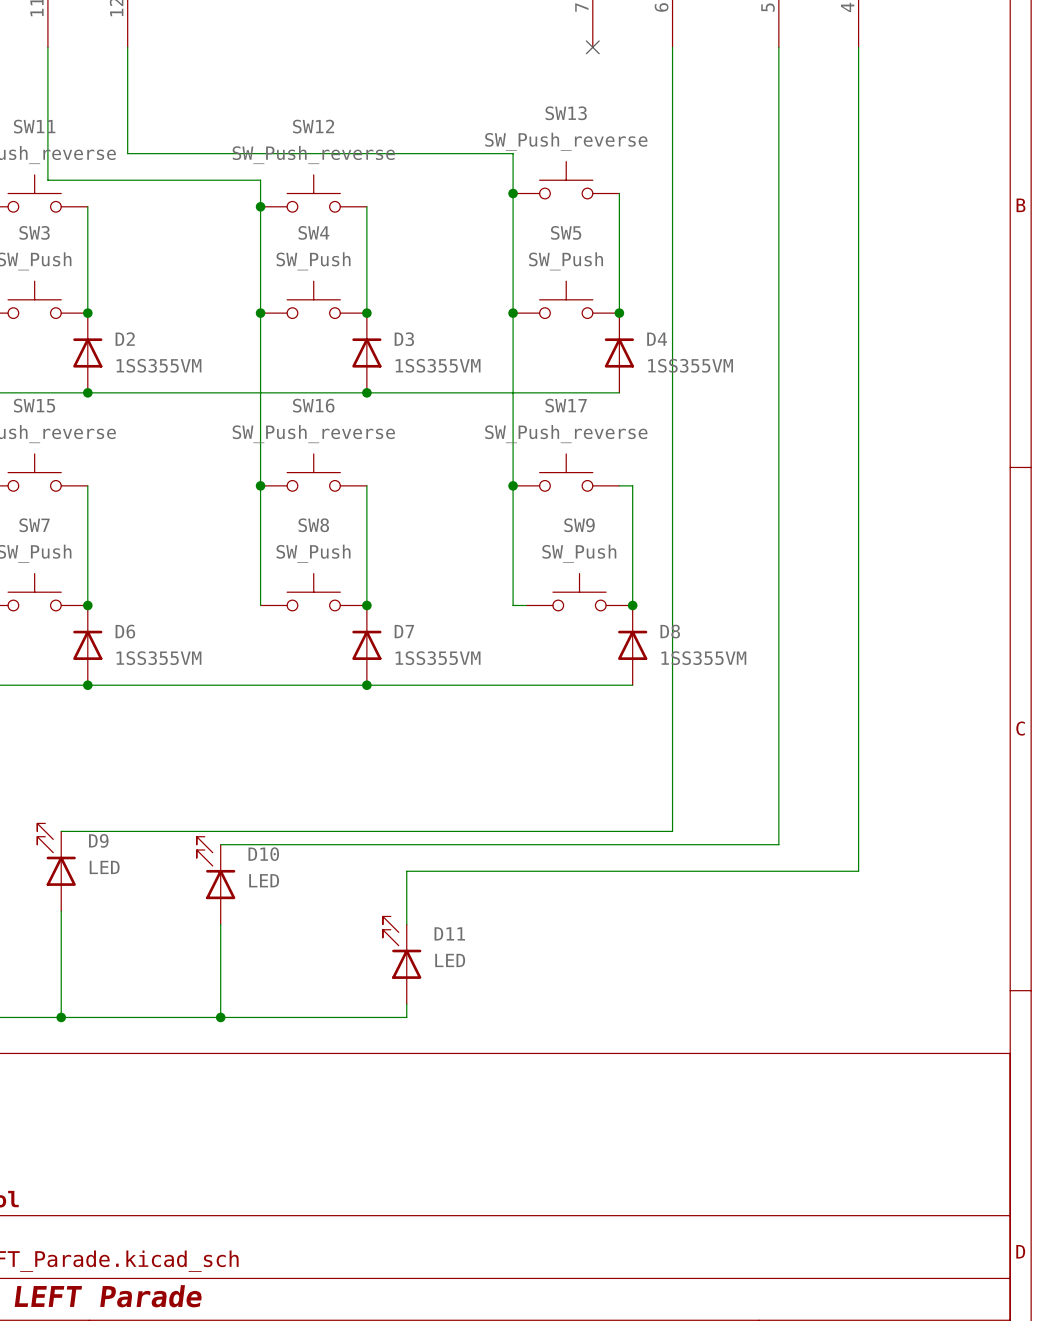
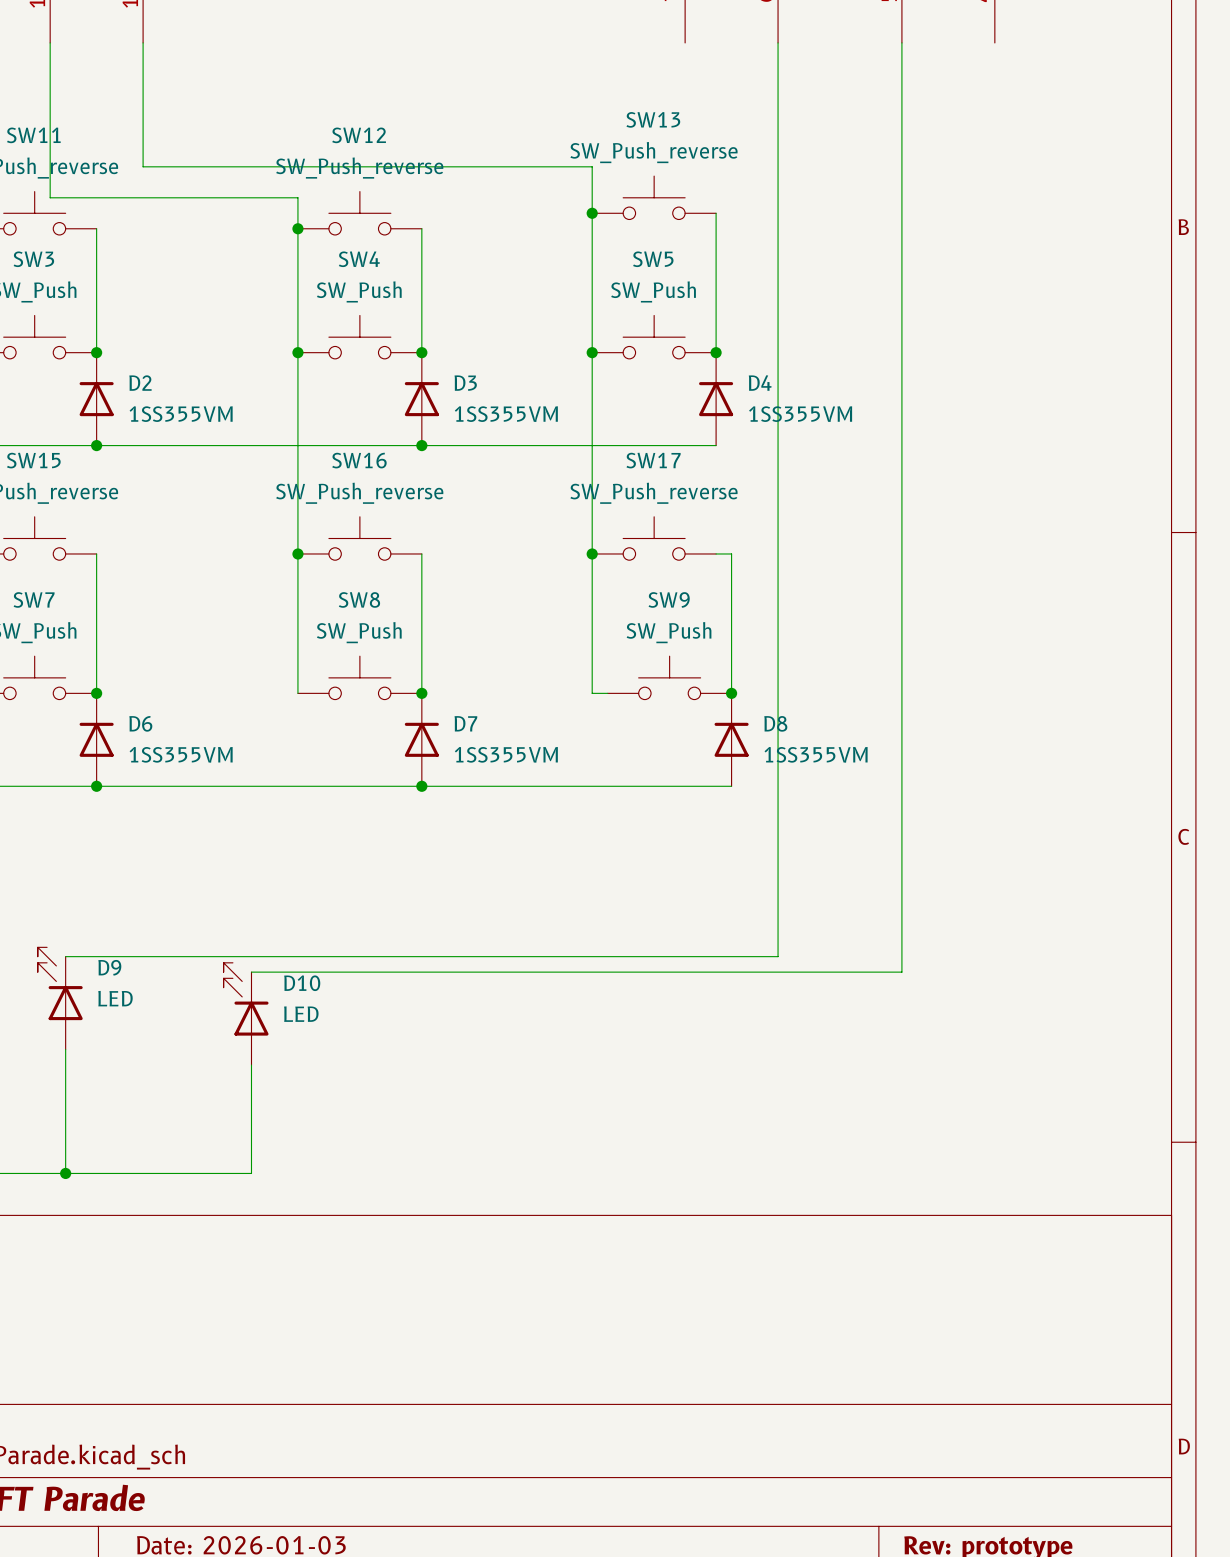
no-connect mark: (592, 47) -> none
wire: (858, 47) (858, 871) (406, 871) (406, 924) -> none
D11: LED (402, 960) -> none
wire: (406, 1004) (406, 1017) (220, 1017) -> none
junction: (220, 1017) -> none

